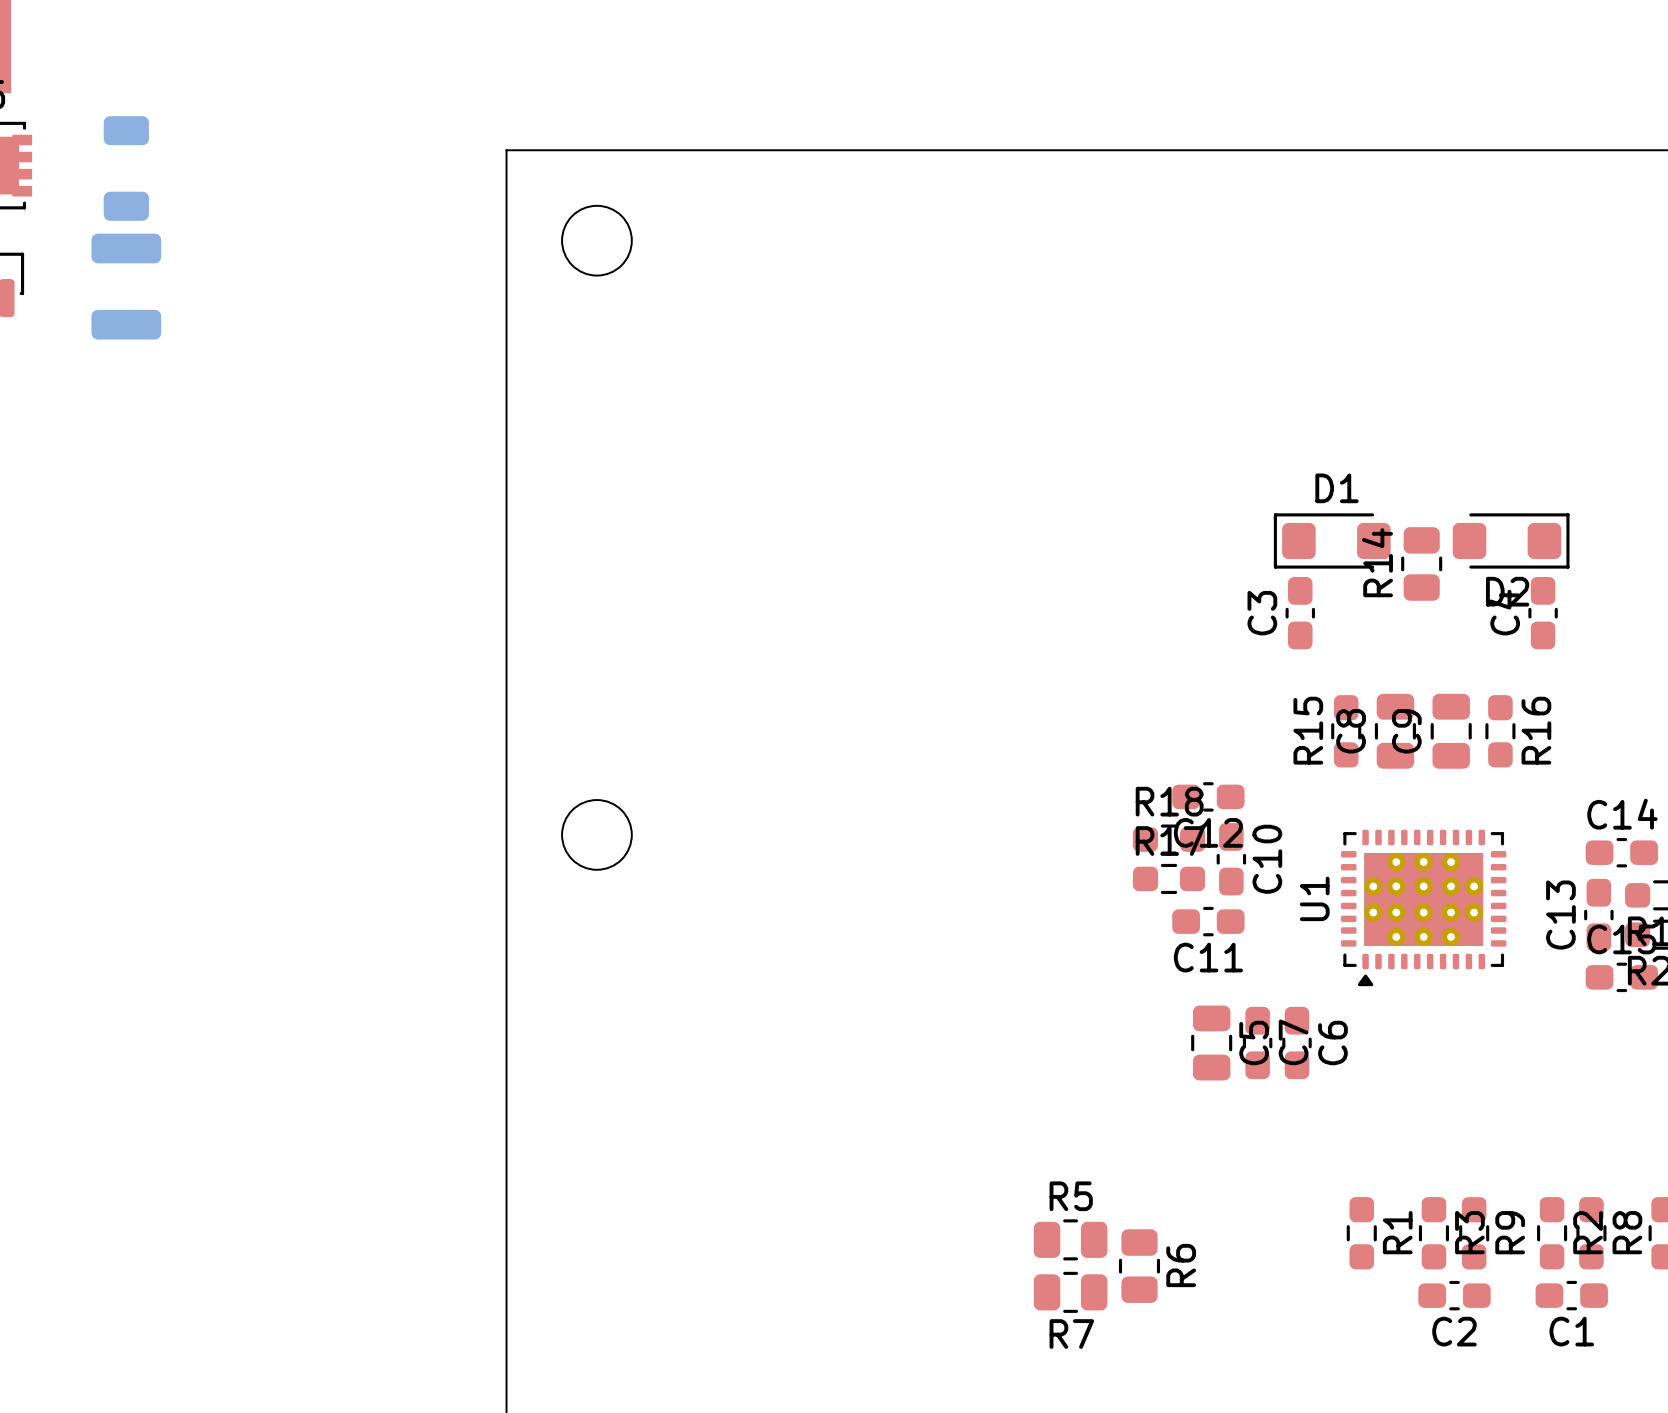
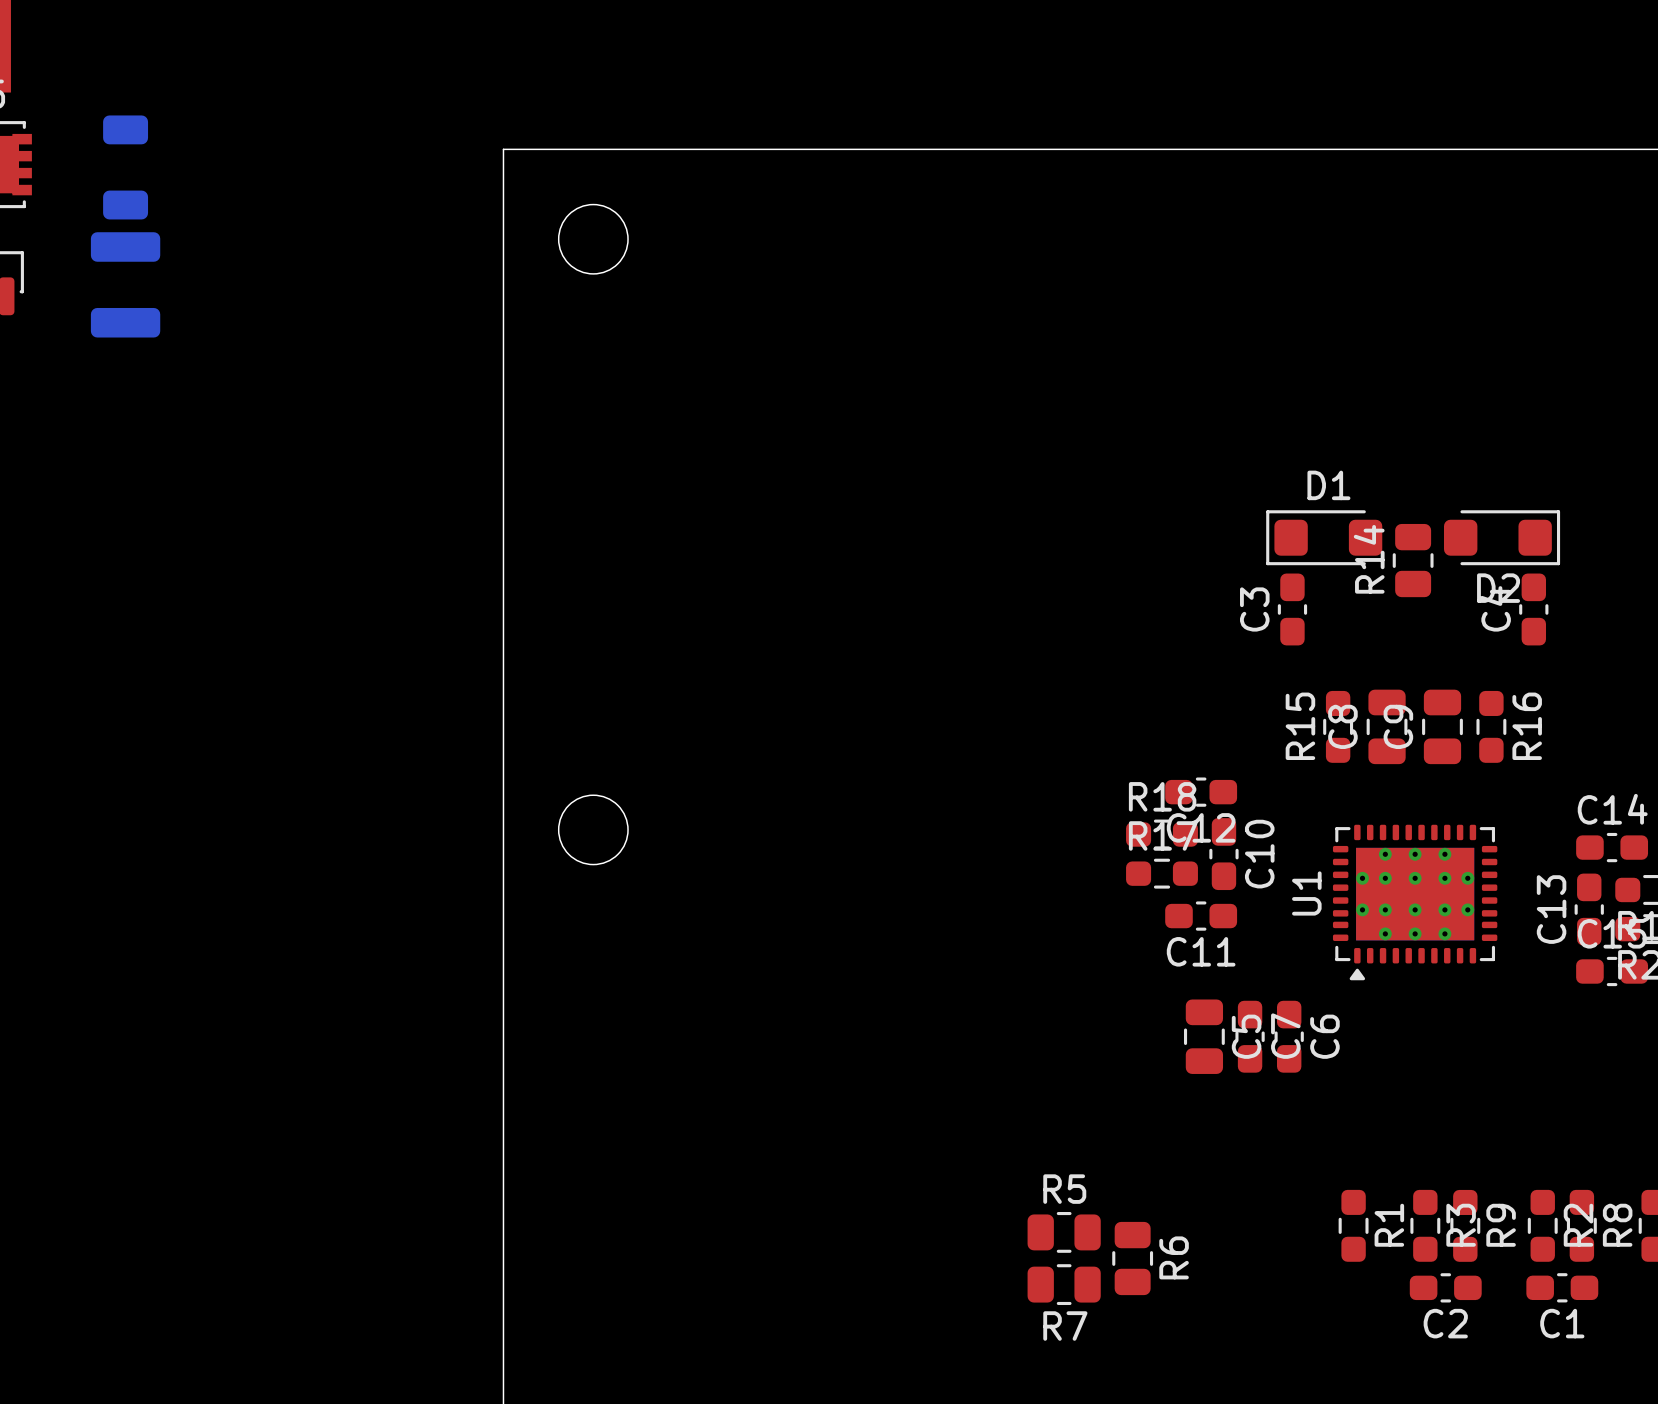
U1 footprint: [1341, 829, 1507, 987] -> [1332, 824, 1498, 981]

